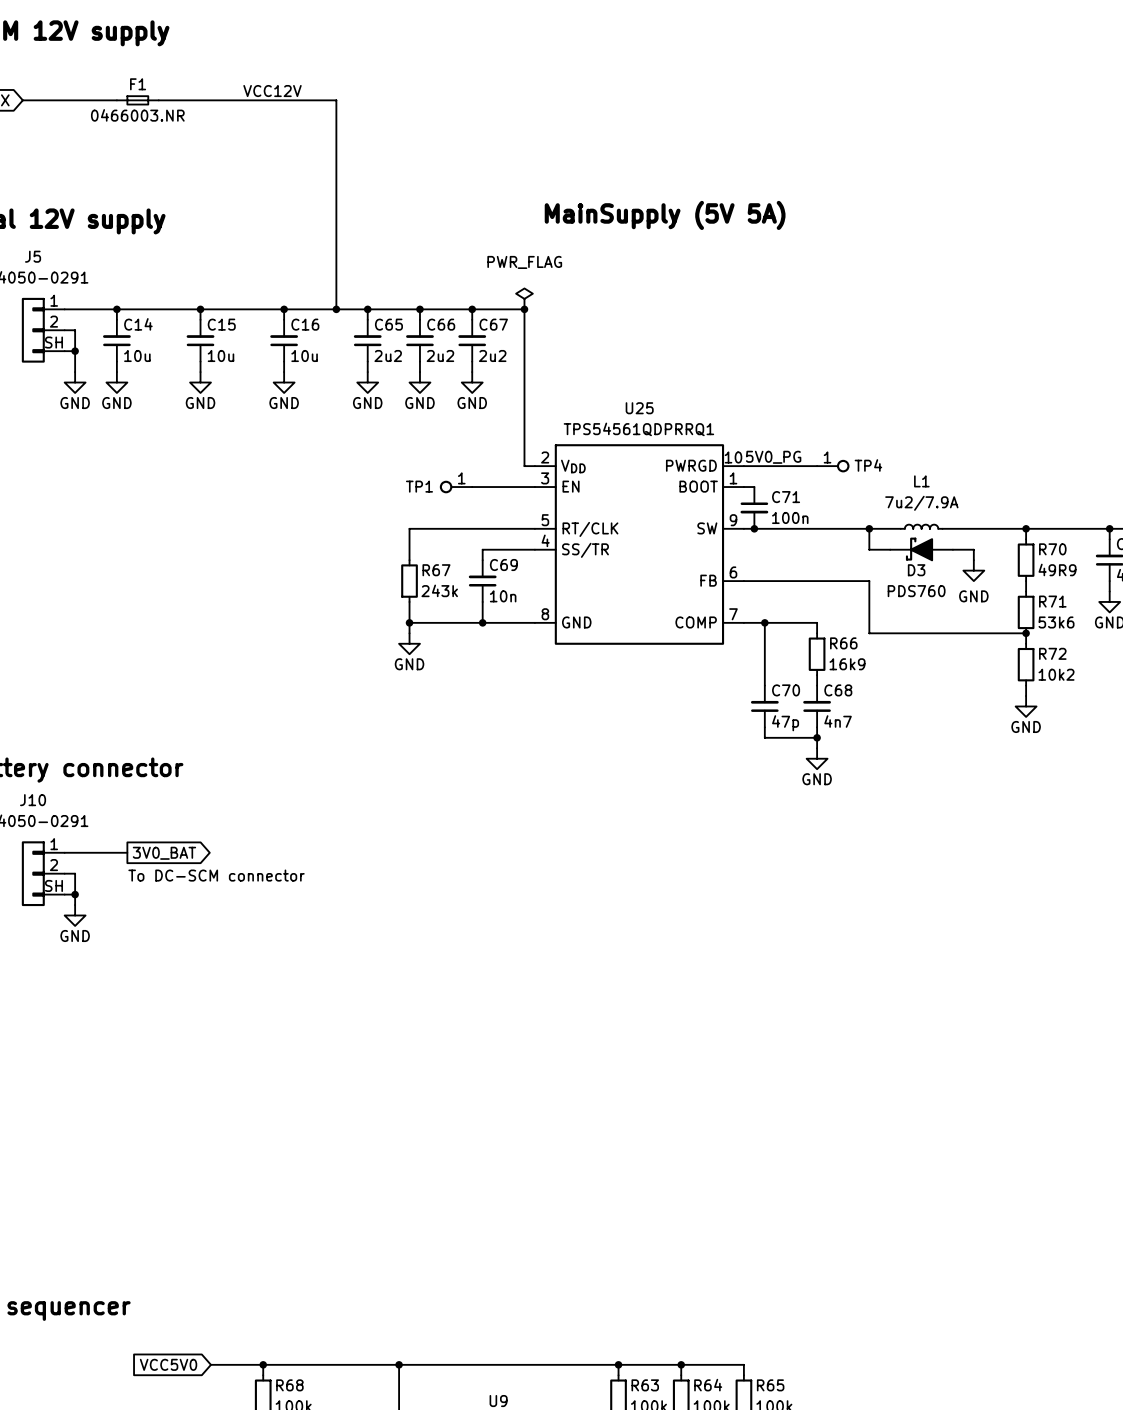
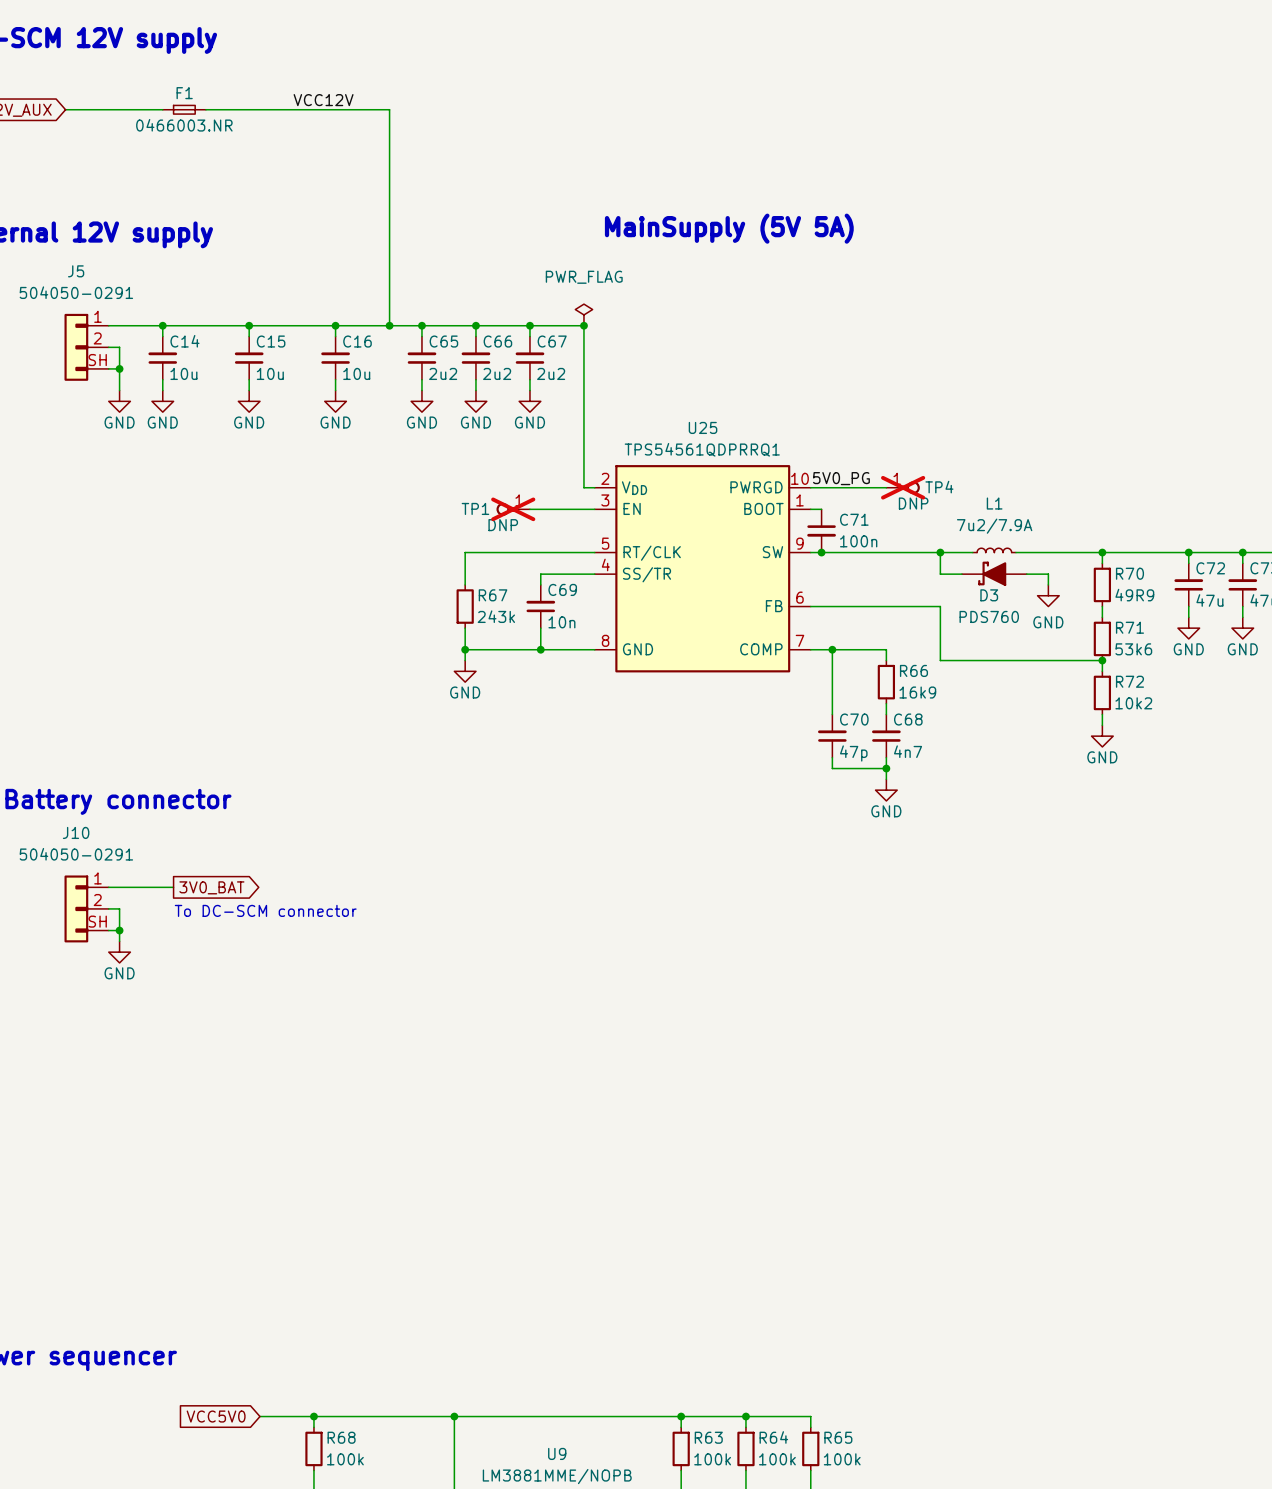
TP4 do-not-place cross: none -> (903, 487)
TP4 text: none -> DNP (913, 503)
TP1 do-not-place cross: none -> (513, 509)
TP1 text: none -> DNP (503, 525)

